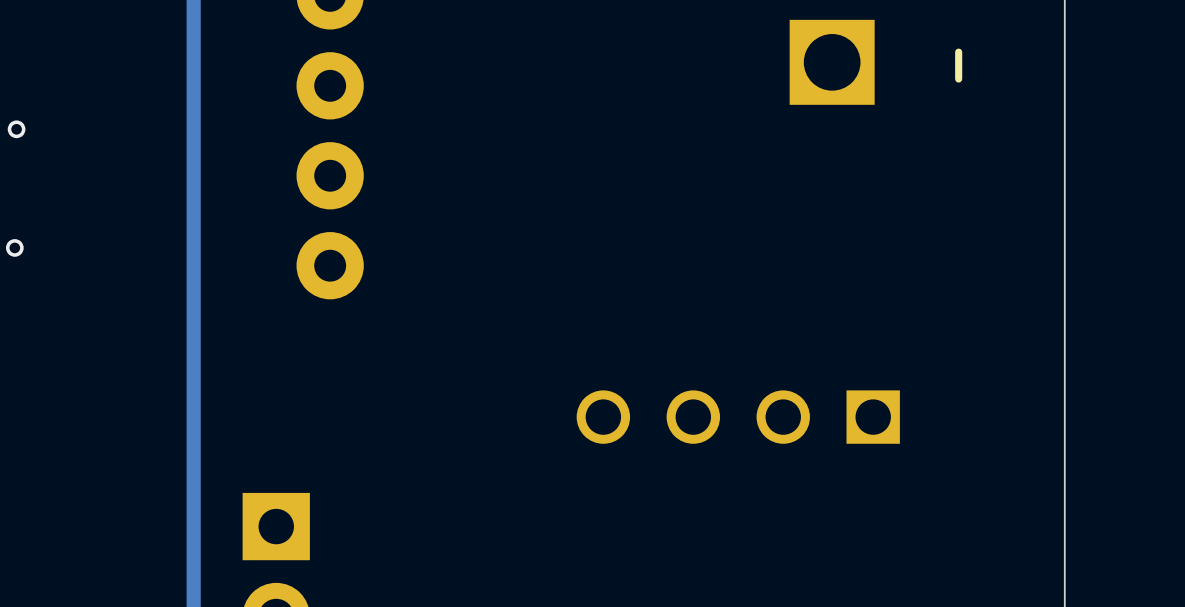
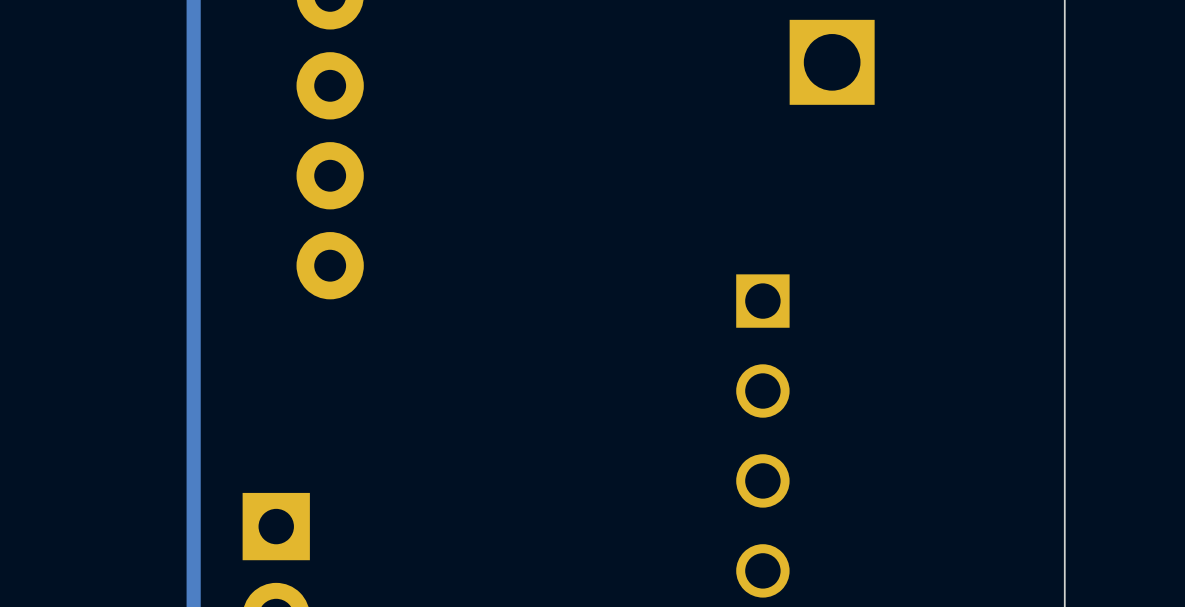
text: - (958, 65) -> none
via: (16, 129) -> none
via: (14, 247) -> none
part rotation: 0° (738, 417) -> 90° counterclockwise (762, 435)

